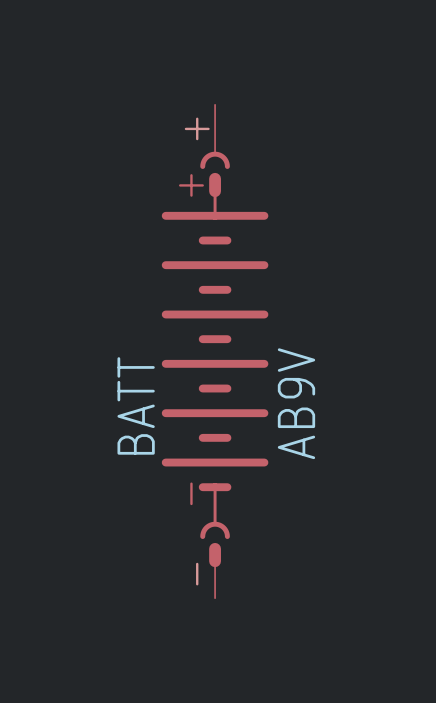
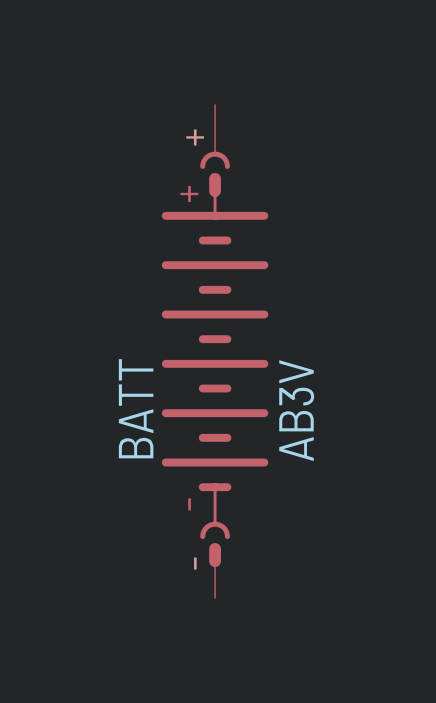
BATT value: AB9V (296, 403) -> AB3V (296, 410)

